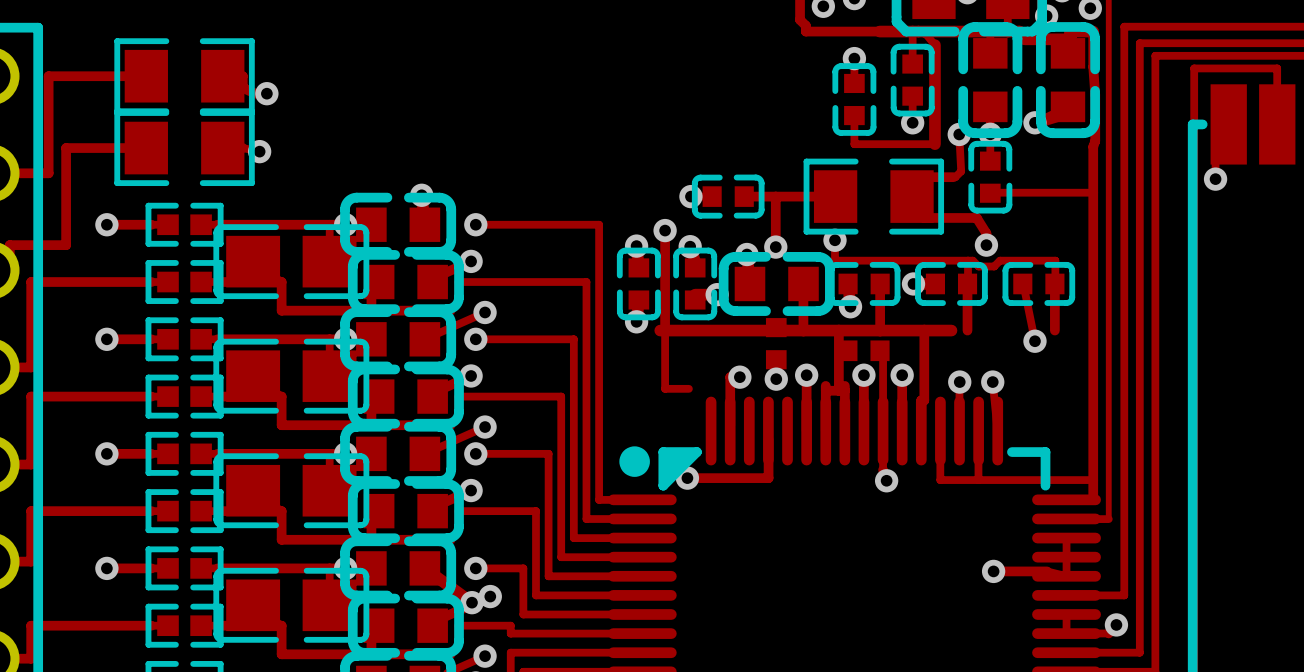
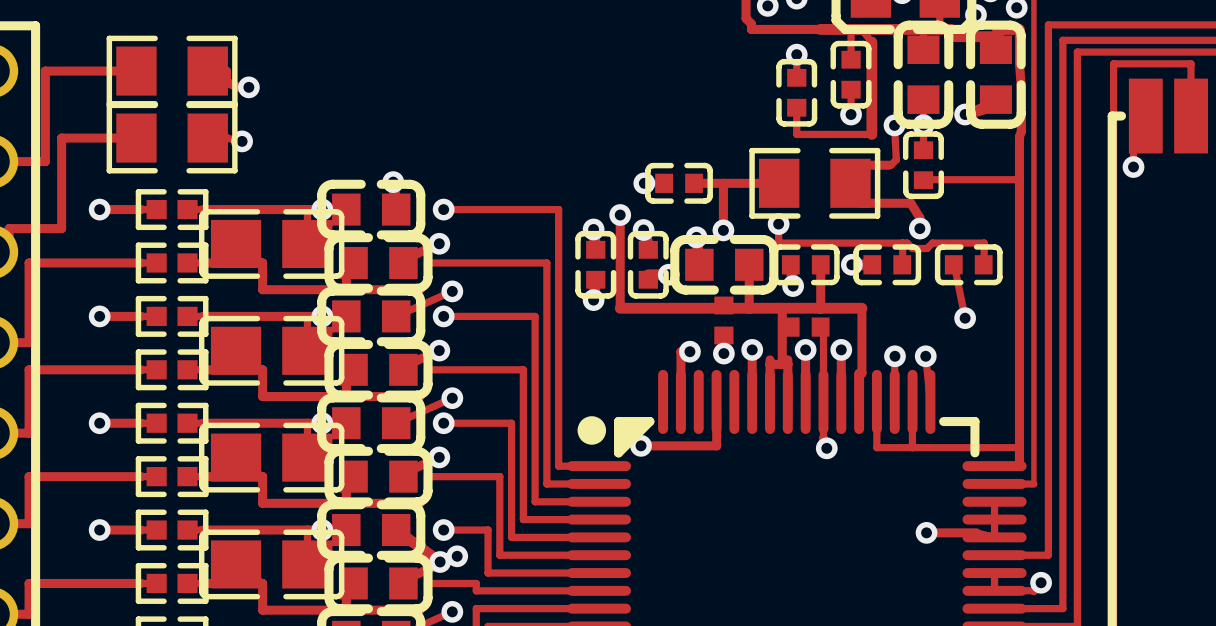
track: (967, 283) (967, 330) -> none
track: (1054, 283) (1054, 330) -> none
track: (660, 330) (665, 330) (665, 388) (688, 388) -> none
track: (924, 330) (951, 330) -> none

